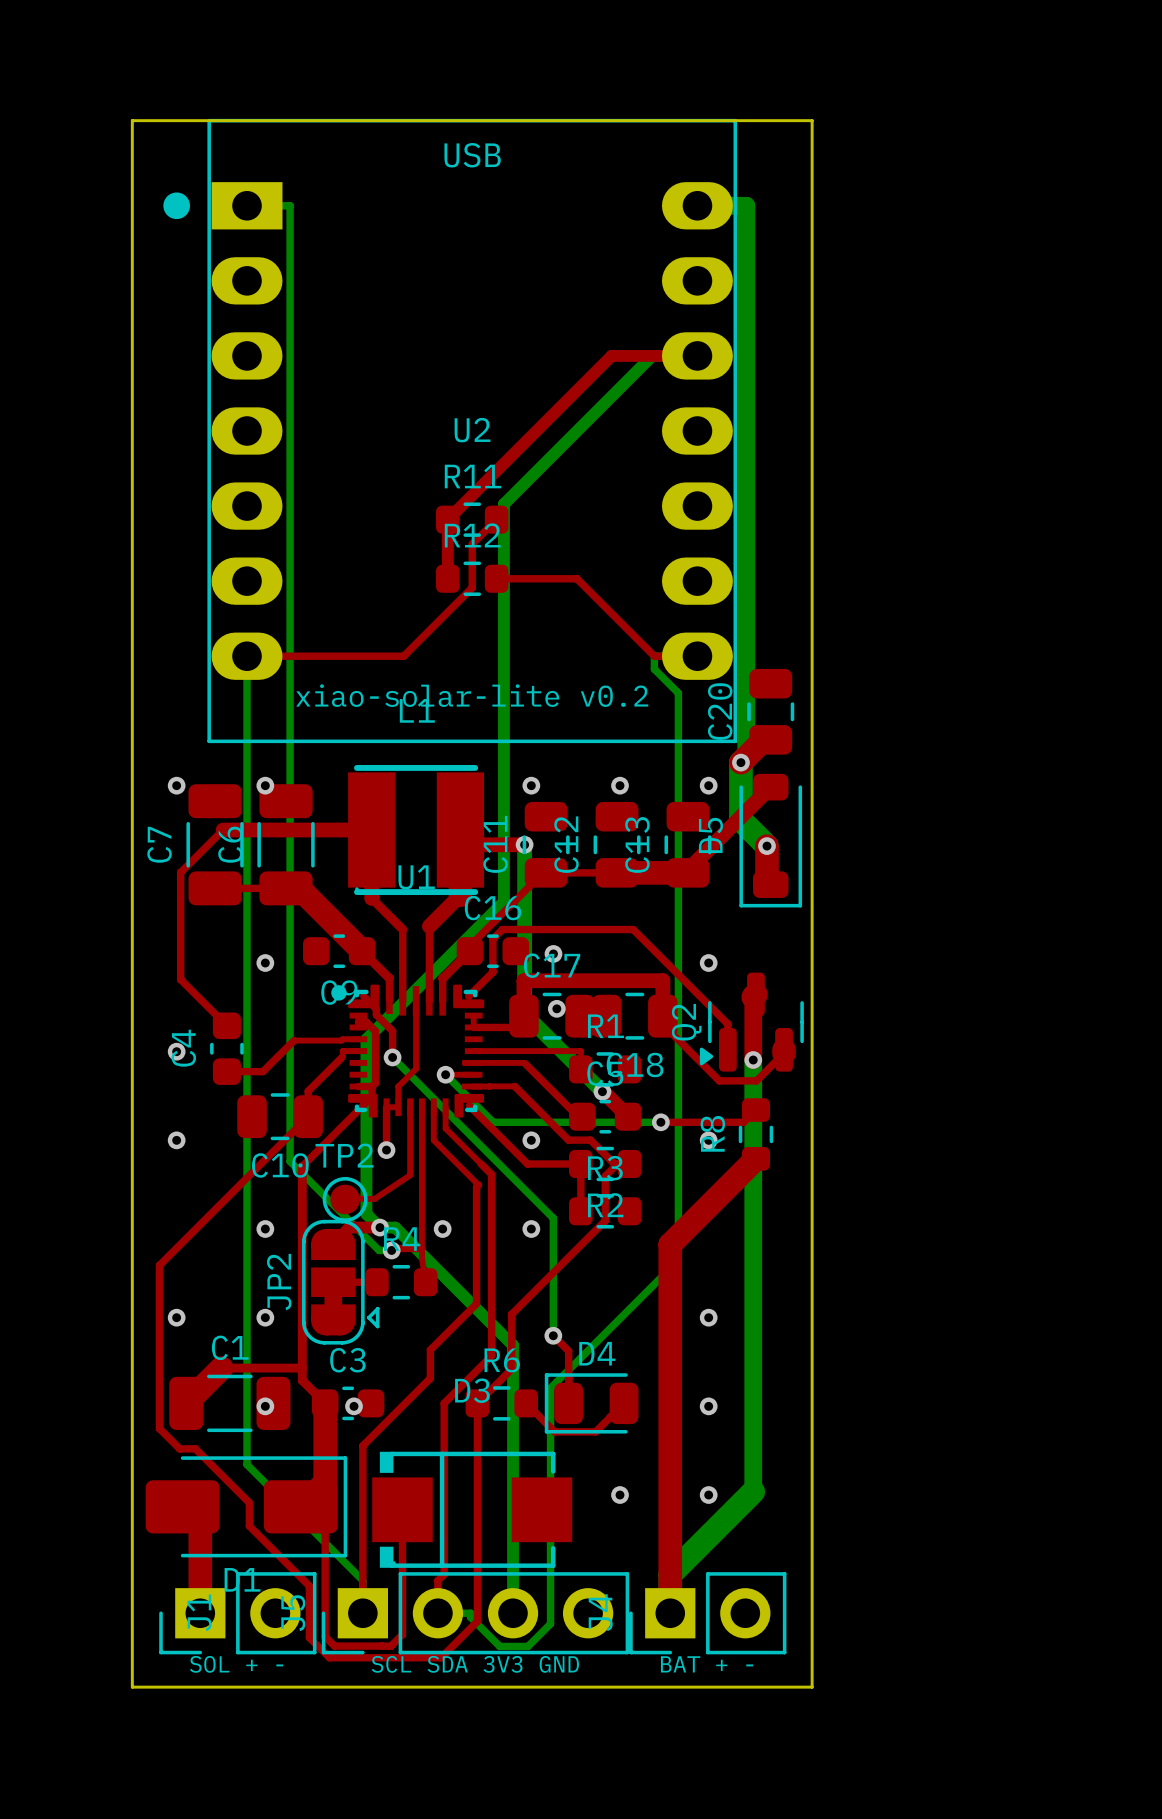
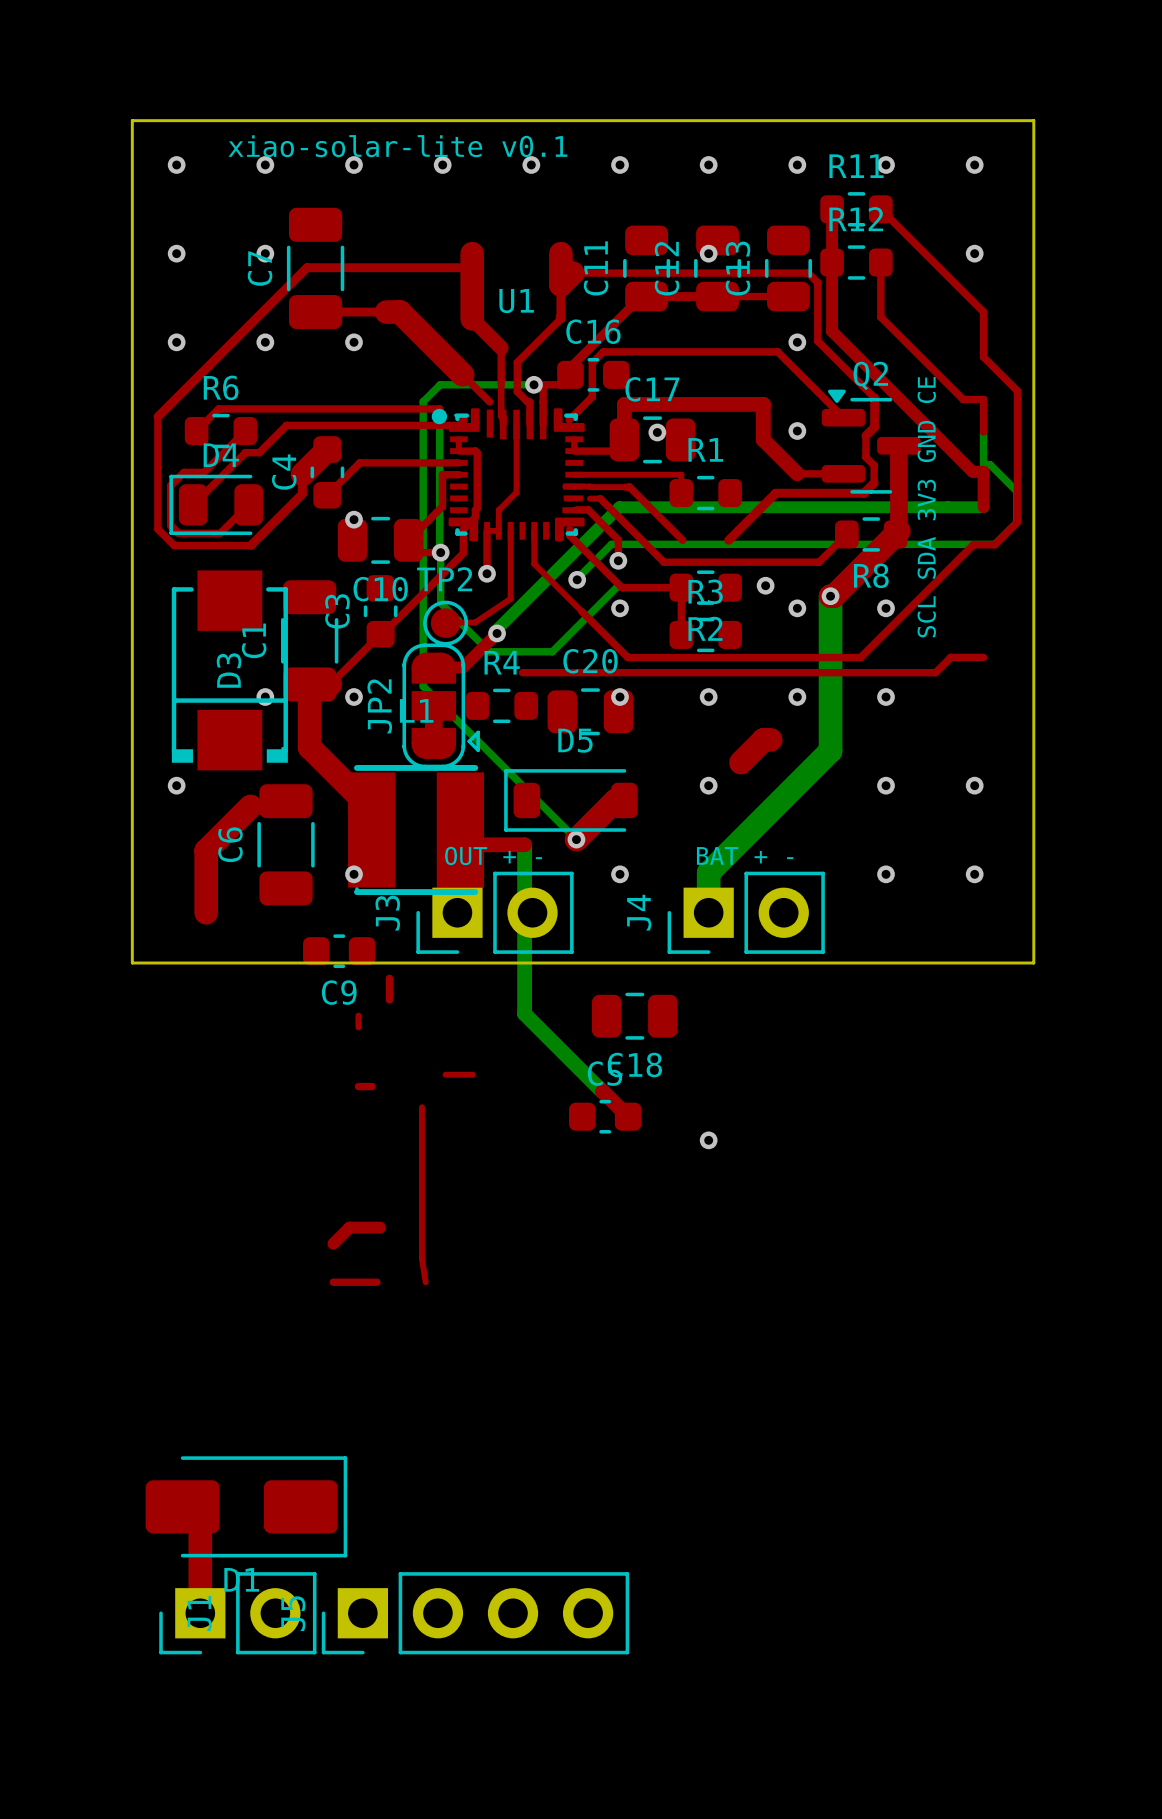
board edge: (812, 120) (812, 1687) (132, 1687) (132, 963) -> (812, 120) (1033, 120) (1033, 963) (132, 963)
text: none -> xiao-solar-lite v0.1 (397, 146)
via: none -> (176, 164)
via: none -> (265, 164)
via: none -> (354, 164)
via: none -> (442, 164)
via: none -> (531, 164)
via: none -> (620, 164)
via: none -> (708, 164)
via: none -> (797, 164)
via: none -> (886, 164)
via: none -> (974, 164)
bottom track: (247, 205) (290, 205) (290, 1161) (379, 1250) (391, 1250) -> none
bottom track: (697, 205) (746, 205) (746, 757) (740, 762) (740, 820) (766, 846) -> none
top track: none -> (832, 209) (832, 331) (972, 471) (983, 471) (983, 507)
top track: none -> (880, 209) (983, 312) (983, 357) (1017, 390) (1017, 522) (994, 544) (973, 544) (860, 657) (627, 657) (534, 564) (534, 530)
via: none -> (176, 253)
via: none -> (265, 253)
top track: none -> (472, 253) (472, 318) (501, 347) (501, 416) (503, 424)
top track: none -> (560, 253) (560, 284)
via: none -> (708, 253)
via: none -> (974, 253)
top track: none -> (880, 262) (880, 317) (963, 399) (983, 399) (983, 432)
top track: none -> (472, 267) (307, 267) (157, 416) (157, 529) (174, 545) (250, 545) (302, 493) (302, 474) (327, 449)
top track: none -> (560, 284) (572, 273) (808, 273) (817, 282) (817, 341) (874, 397) (874, 427) (865, 435) (865, 457) (874, 465) (874, 482) (863, 493) (775, 493) (728, 540)
top track: none -> (560, 284) (560, 318) (517, 362) (517, 391) (529, 402) (529, 424)
top track: none -> (788, 296) (641, 296) (570, 367) (570, 374) (560, 384) (534, 384)
via: none -> (176, 342)
via: none -> (265, 342)
via: none -> (354, 342)
via: none -> (797, 342)
top track: (697, 355) (611, 355) (447, 519) (447, 578) -> none
bottom track: (697, 355) (652, 355) (503, 504) (503, 901) (366, 1039) (366, 1214) (379, 1227) (395, 1227) (513, 1345) (513, 1613) -> none
bottom track: none -> (534, 384) (440, 384) (423, 401) (423, 686) (576, 839)
via: none -> (534, 384)
top track: none -> (543, 384) (543, 424)
top track: none -> (439, 408) (218, 408) (196, 430)
bottom track: none -> (439, 408) (440, 603) (489, 651) (552, 651) (618, 585)
top track: none -> (843, 417) (777, 351) (603, 351) (592, 362) (592, 396) (569, 420)
top track: none -> (464, 420) (458, 425) (286, 425) (259, 452) (245, 452) (193, 504)
top track: none -> (245, 430) (204, 472) (183, 472) (170, 485) (170, 525) (178, 533) (220, 533) (248, 504)
U2: (450, 430) -> none
via: none -> (797, 430)
via: none -> (657, 432)
bottom track: none -> (983, 432) (983, 464) (990, 464) (1016, 491) (1016, 522) (995, 544) (611, 544) (577, 579)
top track: none -> (458, 439) (458, 451) (475, 451) (477, 452) (477, 508) (475, 517) (463, 529) (463, 553) (330, 684) (309, 684) (309, 747) (368, 806)
top track: none -> (574, 439) (574, 451) (624, 451) (624, 404) (763, 404) (763, 439) (797, 473) (843, 473)
top track: none -> (898, 445) (898, 531) (833, 596) (830, 596)
top track: none -> (458, 462) (359, 462) (327, 495)
top track: none -> (458, 474) (442, 474) (442, 506) (408, 540) (420, 552) (440, 552)
top track: none -> (565, 486) (629, 487) (682, 540)
top track: none -> (589, 498) (600, 498) (663, 562) (819, 562) (846, 534)
text: none -> SCL SDA 3V3 GND CE (926, 507)
bottom track: none -> (983, 507) (619, 507) (497, 629) (497, 633)
top track: none -> (576, 509) (588, 509) (618, 539) (618, 560)
via: none -> (354, 519)
R11 position: (472, 519) -> (856, 209)
top track: (496, 519) (472, 544) (472, 587) (403, 656) (247, 656) -> none
top track: none -> (569, 529) (569, 535) (621, 587) (681, 587) (681, 634)
via: none -> (440, 552)
via: none -> (618, 560)
via: none -> (487, 573)
R12 position: (472, 578) -> (856, 262)
top track: (496, 578) (576, 578) (654, 656) (697, 656) -> none
via: none -> (577, 579)
via: none -> (765, 585)
bottom track: none -> (830, 596) (830, 750) (708, 872) (708, 912)
via: none -> (830, 596)
via: none -> (620, 608)
via: none -> (797, 608)
via: none -> (886, 608)
top track: none -> (497, 633) (463, 667) (433, 667)
via: none -> (497, 633)
bottom track: (247, 656) (247, 1464) (362, 1580) (362, 1613) -> none
bottom track: (697, 656) (654, 656) (654, 669) (678, 693) (678, 1260) (550, 1388) (550, 1623) (528, 1646) (499, 1646) (470, 1617) (470, 1613) (437, 1613) -> none
top track: none -> (983, 657) (950, 657) (935, 672) (522, 672)
text: xiao-solar-lite v0.2 (472, 695) -> none
via: none -> (265, 697)
via: none -> (354, 697)
via: none -> (620, 697)
via: none -> (708, 697)
via: none -> (797, 697)
via: none -> (886, 697)
C20 rotation: 0° (770, 711) -> 90° clockwise (590, 711)
C20 position: (770, 711) -> (590, 711)
via: (740, 762) -> none
via: (265, 785) -> none
via: (531, 785) -> none
via: (620, 785) -> none
via: none -> (886, 785)
via: none -> (974, 785)
top track: (770, 787) (687, 869) (687, 872) (543, 872) (470, 945) (470, 951) (442, 978) (442, 1000) -> none
top track: none -> (624, 800) (615, 800) (576, 839)
top track: none -> (250, 806) (206, 850) (206, 912)
top track: (460, 830) (460, 895) (429, 926) (429, 1000) -> none
via: none -> (576, 839)
D5 rotation: 0° (770, 840) -> 90° clockwise (570, 800)
D5 position: (770, 840) -> (570, 800)
C7 position: (215, 844) -> (315, 268)
via: (524, 844) -> none
C11 position: (546, 844) -> (646, 268)
C12 position: (617, 844) -> (717, 268)
C13 position: (687, 844) -> (788, 268)
top track: (766, 846) (766, 880) (770, 884) -> none
via: (766, 846) -> none
text: none -> OUT + - (493, 855)
text: none -> BAT + - (745, 855)
via: none -> (354, 874)
via: none -> (620, 874)
via: none -> (886, 874)
via: none -> (974, 874)
top track: (215, 888) (299, 888) (389, 978) -> (315, 312) (399, 312) (489, 401)
J3: none -> (494, 912)
C16 position: (492, 951) -> (593, 374)
via: (553, 953) -> none
via: (265, 963) -> none
via: (708, 963) -> none
top track: (754, 995) (755, 994) (753, 997) (753, 1060) -> none
top track: (363, 996) (376, 1009) (376, 1014) (392, 1031) (392, 1057) -> none
top track: (468, 996) (492, 972) (492, 939) (502, 929) (633, 929) (727, 1024) (727, 1049) -> none
top track: (402, 1000) (402, 929) (371, 898) (371, 830) (223, 830) (180, 872) (180, 979) (226, 1025) -> none
top track: (416, 1000) (416, 1068) (398, 1086) (398, 1107) (386, 1107) (386, 1150) -> (516, 424) (516, 492) (498, 510) (498, 530) (487, 530) (487, 573)
via: (556, 1008) -> none
top track: (473, 1015) (473, 1027) (523, 1027) (523, 980) (662, 980) (662, 1024) (719, 1080) (756, 1080) (784, 1053) (784, 1049) -> none
C17 position: (552, 1016) -> (652, 439)
top track: (358, 1021) (365, 1021) (375, 1031) (375, 1083) (372, 1086) (372, 1096) (302, 1166) (302, 1380) (325, 1403) (325, 1636) (334, 1646) (391, 1646) (402, 1634) (402, 1509) -> none
Q2 rotation: 0° (751, 1022) -> 90° clockwise (871, 441)
Q2 position: (751, 1022) -> (871, 441)
top track: (358, 1039) (294, 1040) (262, 1071) (226, 1071) -> none
C4 position: (226, 1048) -> (327, 472)
via: (176, 1051) -> none
top track: (358, 1051) (342, 1051) (342, 1056) (308, 1091) (308, 1116) (159, 1265) (159, 1428) (179, 1448) (195, 1448) (249, 1502) (249, 1526) (309, 1586) (309, 1637) (329, 1657) (441, 1657) (477, 1621) (477, 1403) (511, 1369) (511, 1314) (605, 1220) (605, 1176) (615, 1165) -> none
U1 position: (407, 1051) -> (508, 474)
top track: (473, 1051) (580, 1051) (580, 1069) -> (574, 474) (681, 474) (681, 493)
bottom track: (392, 1057) (553, 1218) (553, 1335) -> none
via: (392, 1057) -> none
bottom track: (753, 1060) (753, 1491) (670, 1574) (670, 1613) -> none
via: (753, 1060) -> none
top track: (464, 1062) (524, 1062) (578, 1116) (582, 1116) -> none
R1 position: (605, 1069) -> (705, 493)
bottom track: (445, 1074) (493, 1122) (660, 1122) -> none
via: (445, 1074) -> none
top track: (472, 1086) (514, 1086) (568, 1140) (590, 1140) (615, 1165) -> none
via: (602, 1091) -> none
top track: (469, 1105) (527, 1163) (580, 1163) (580, 1211) -> none
top track: (410, 1107) (410, 1175) (374, 1198) (345, 1198) -> (510, 530) (510, 598) (475, 622) (445, 622)
top track: (433, 1107) (433, 1140) (478, 1185) (476, 1186) (476, 1303) (430, 1349) (430, 1378) (362, 1445) (362, 1613) -> none
top track: (445, 1107) (445, 1128) (491, 1174) (491, 1355) (444, 1403) (444, 1574) (437, 1580) (437, 1613) -> none
top track: (755, 1110) (743, 1122) (660, 1122) -> none
C10 position: (280, 1116) -> (380, 540)
via: (660, 1122) -> none
R8 name position: R8 (712, 1133) -> R8 (871, 575)
R8 rotation: 0° (755, 1134) -> 90° clockwise (871, 534)
R8 position: (755, 1134) -> (871, 534)
via: (176, 1140) -> none
via: (531, 1140) -> none
via: (386, 1150) -> none
top track: (755, 1158) (670, 1244) (670, 1613) -> none
R2 position: (605, 1163) -> (705, 587)
TP2 position: (345, 1199) -> (445, 623)
R3 position: (605, 1211) -> (705, 634)
via: (379, 1227) -> none
via: (265, 1229) -> none
via: (442, 1229) -> none
via: (531, 1229) -> none
top track: (421, 1248) (393, 1248) (391, 1250) -> none
via: (391, 1250) -> none
JP2 position: (340, 1282) -> (441, 705)
R4 position: (401, 1282) -> (501, 705)
via: (176, 1317) -> none
via: (265, 1317) -> none
via: (708, 1317) -> none
top track: (553, 1335) (568, 1351) (568, 1403) -> none
via: (553, 1335) -> none
C1 name position: C1 (230, 1347) -> C1 (254, 640)
C3 name position: C3 (347, 1360) -> C3 (337, 611)
top track: (302, 1368) (221, 1368) (186, 1403) -> none
D3 name position: D3 (472, 1390) -> D3 (229, 670)
C1 rotation: 0° (229, 1403) -> 90° clockwise (309, 640)
C1 position: (229, 1403) -> (309, 640)
C3 rotation: 0° (348, 1403) -> 90° clockwise (380, 611)
C3 position: (348, 1403) -> (380, 611)
R6 position: (501, 1403) -> (221, 430)
top track: (526, 1403) (554, 1431) (595, 1431) (624, 1403) (609, 1417) -> none
D4 position: (591, 1403) -> (216, 504)
via: (265, 1406) -> none
via: (354, 1406) -> none
via: (708, 1406) -> none
via: (620, 1495) -> none
via: (708, 1495) -> none
D3 rotation: 0° (472, 1509) -> 90° counterclockwise (229, 670)
D3 position: (472, 1509) -> (229, 670)
J4 position: (707, 1613) -> (746, 912)
text: SOL + - (236, 1664) -> none
text: SCL SDA 3V3 GND (475, 1664) -> none
text: BAT + - (707, 1664) -> none

